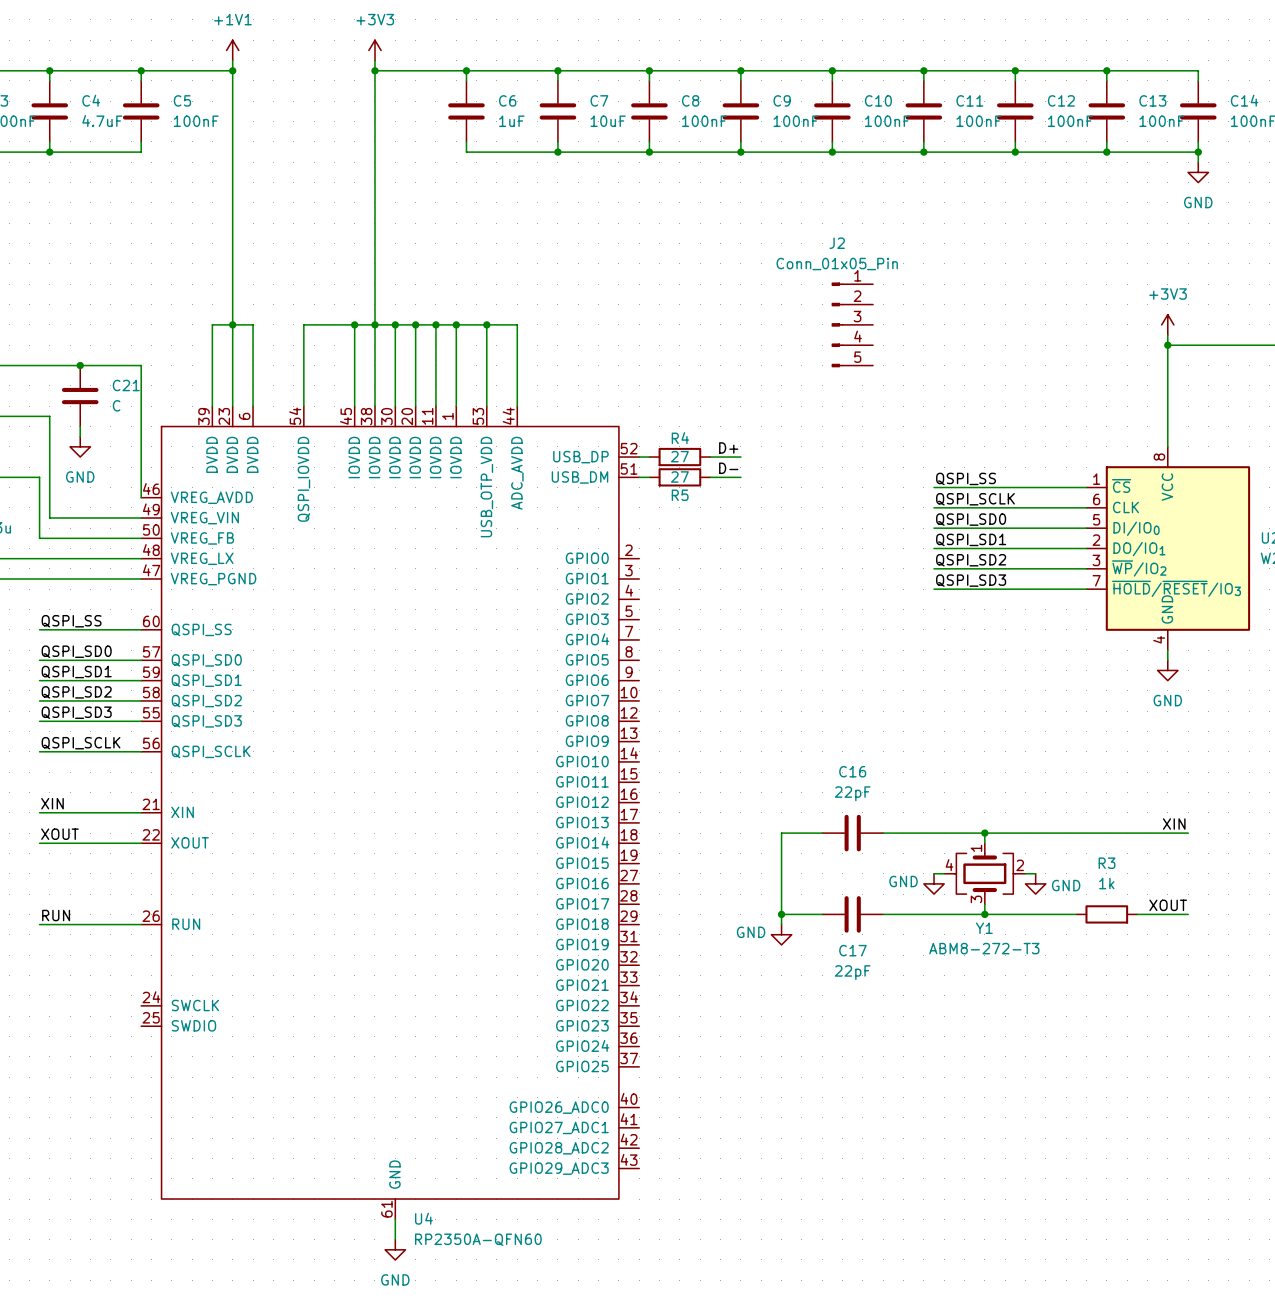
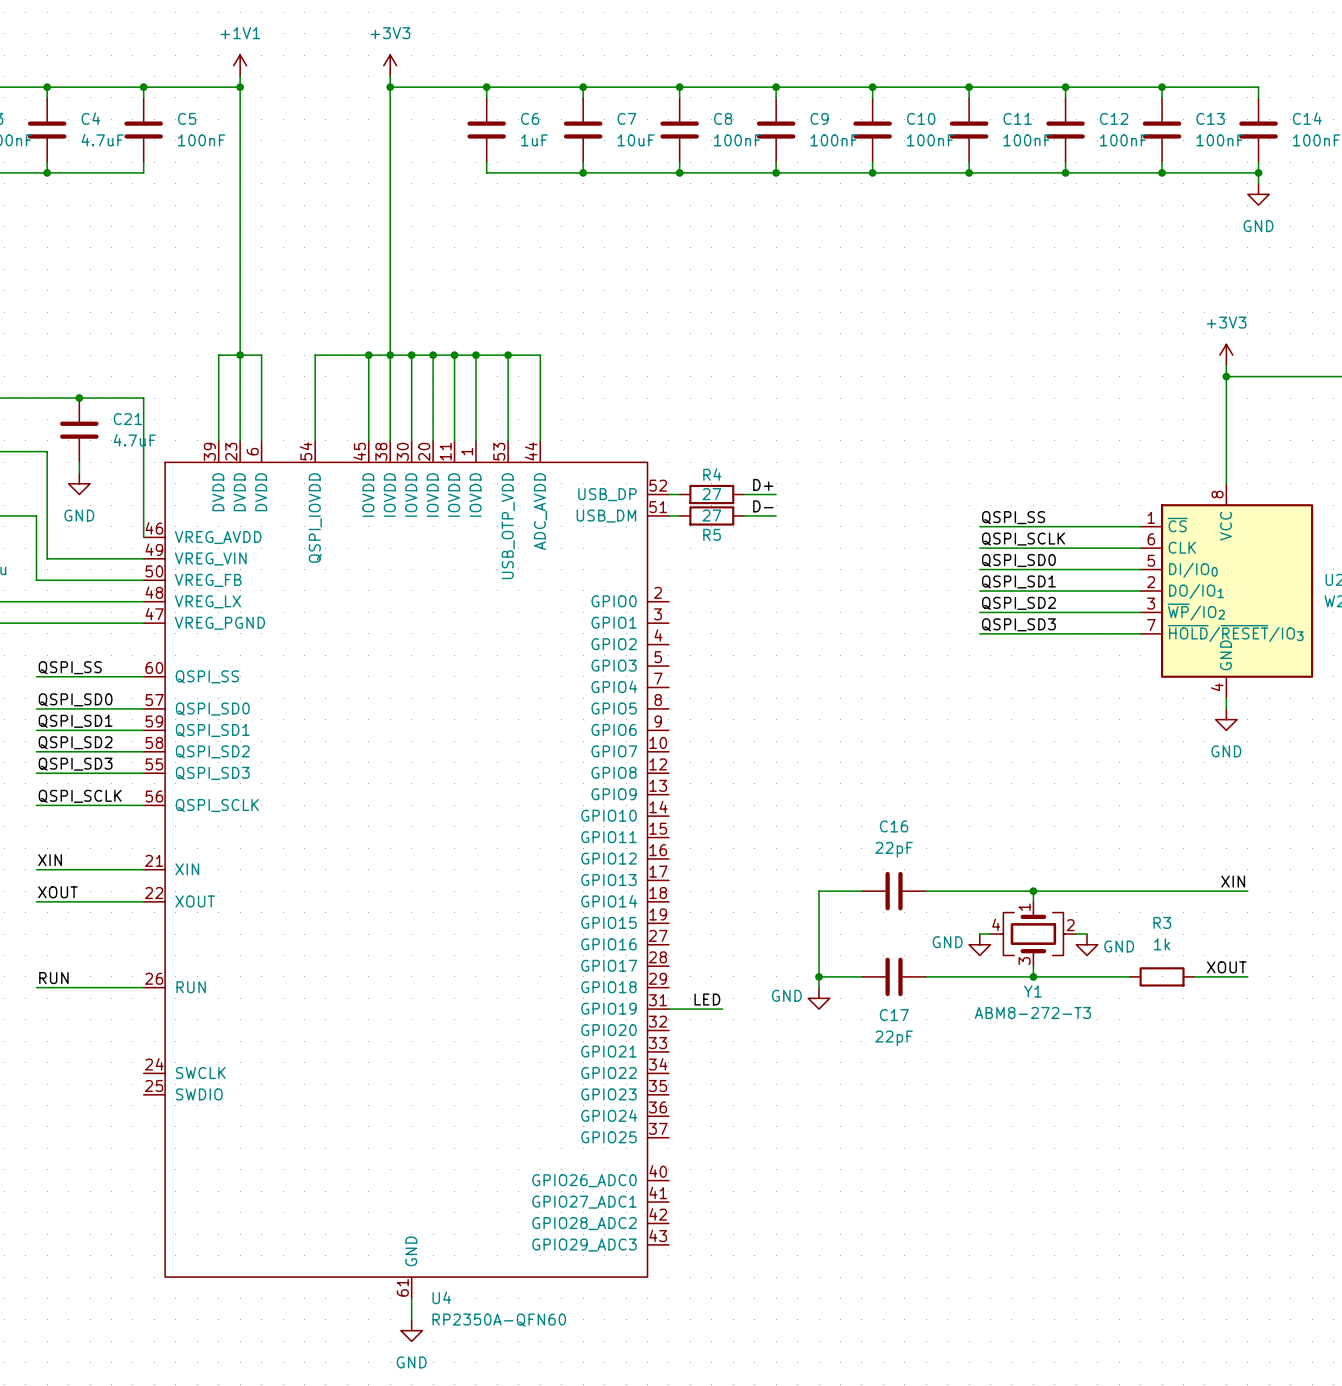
J2: Conn_01x05_Pin (852, 324) -> none
C21 value: C (116, 405) -> 4.7uF (134, 440)
label: none -> LED (707, 999)
wire: none -> (668, 1009) (722, 1009)

